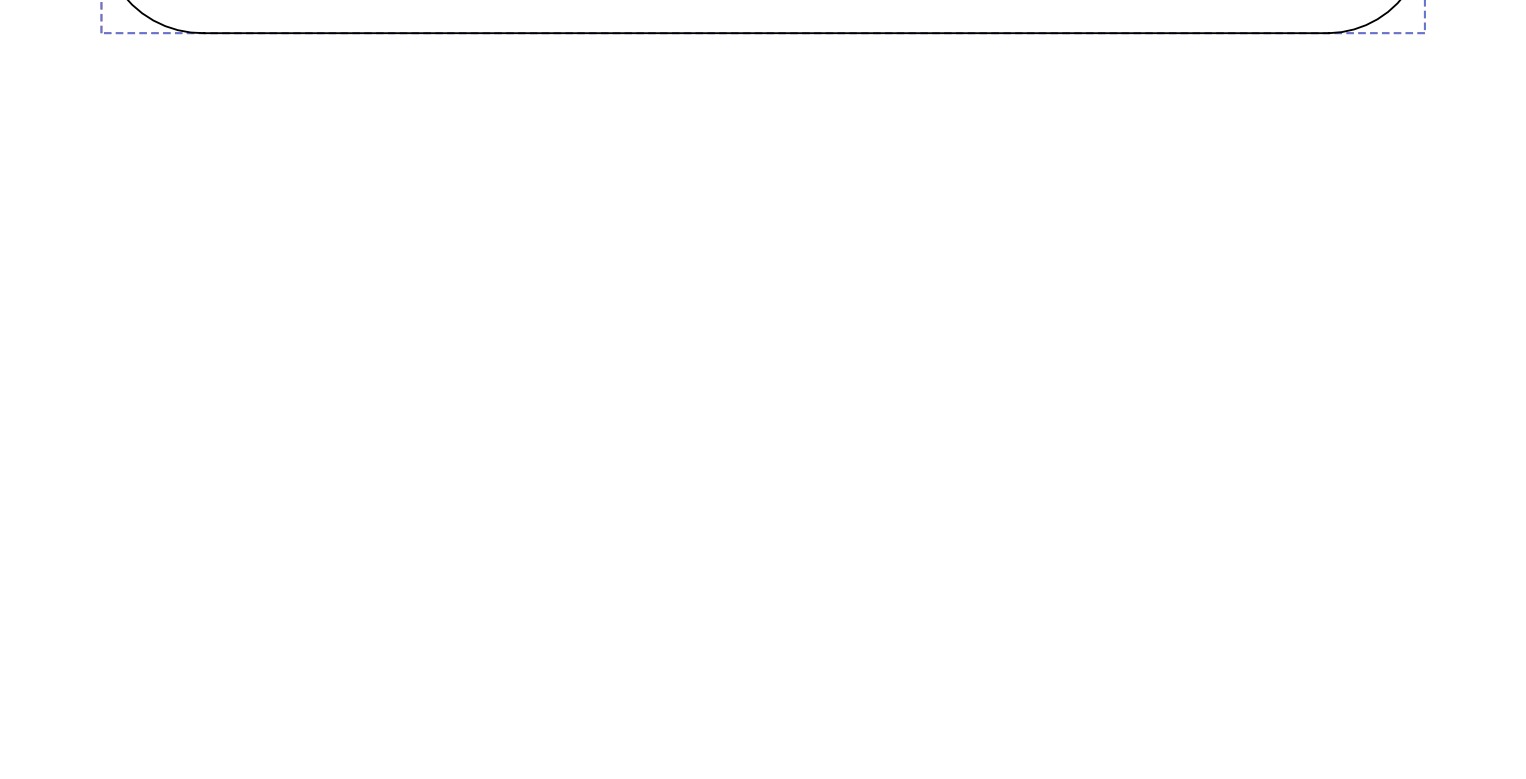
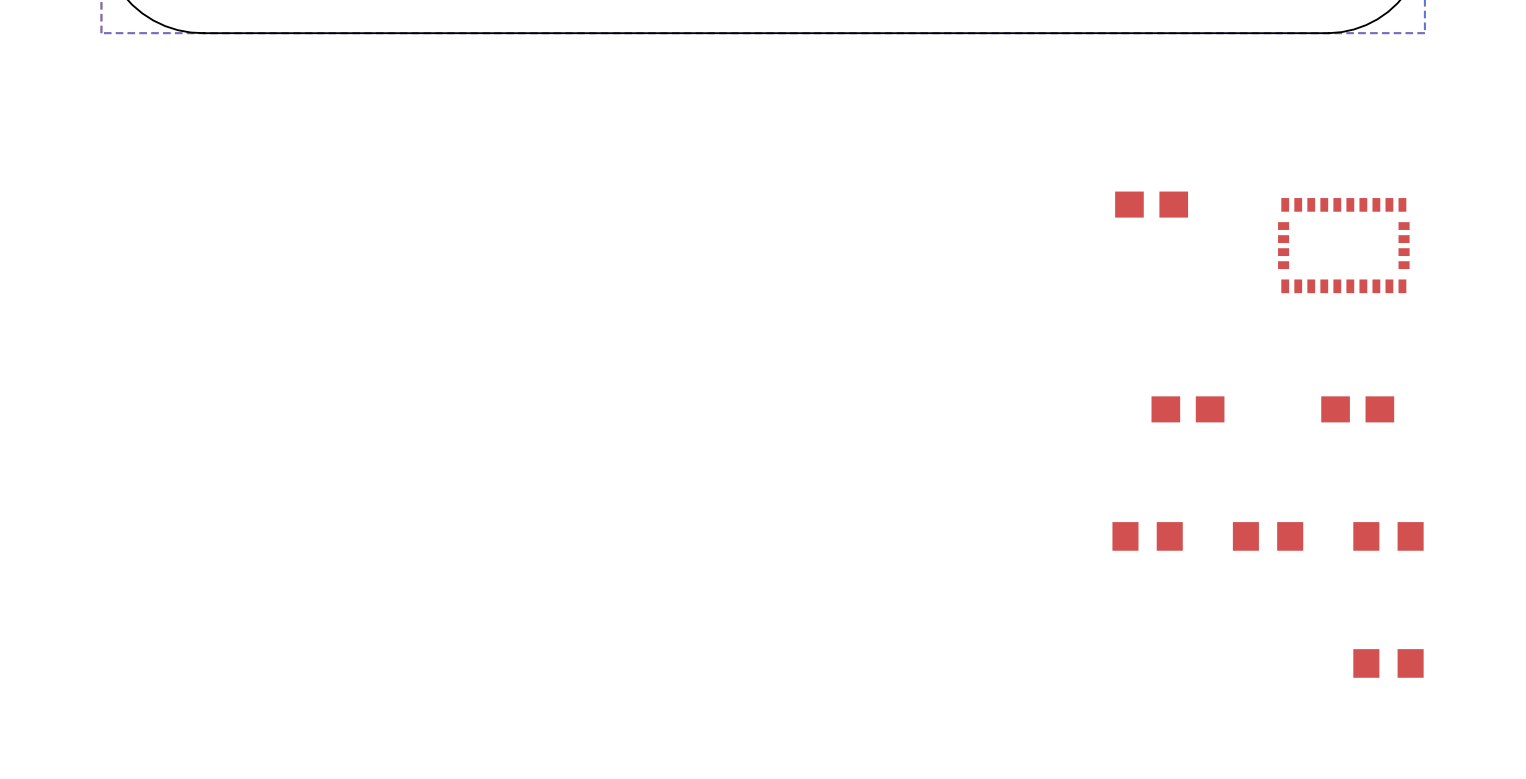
part: none -> (1151, 204)
part: none -> (1343, 245)
part: none -> (1187, 409)
part: none -> (1357, 409)
part: none -> (1147, 536)
part: none -> (1268, 536)
part: none -> (1388, 536)
part: none -> (1388, 663)

